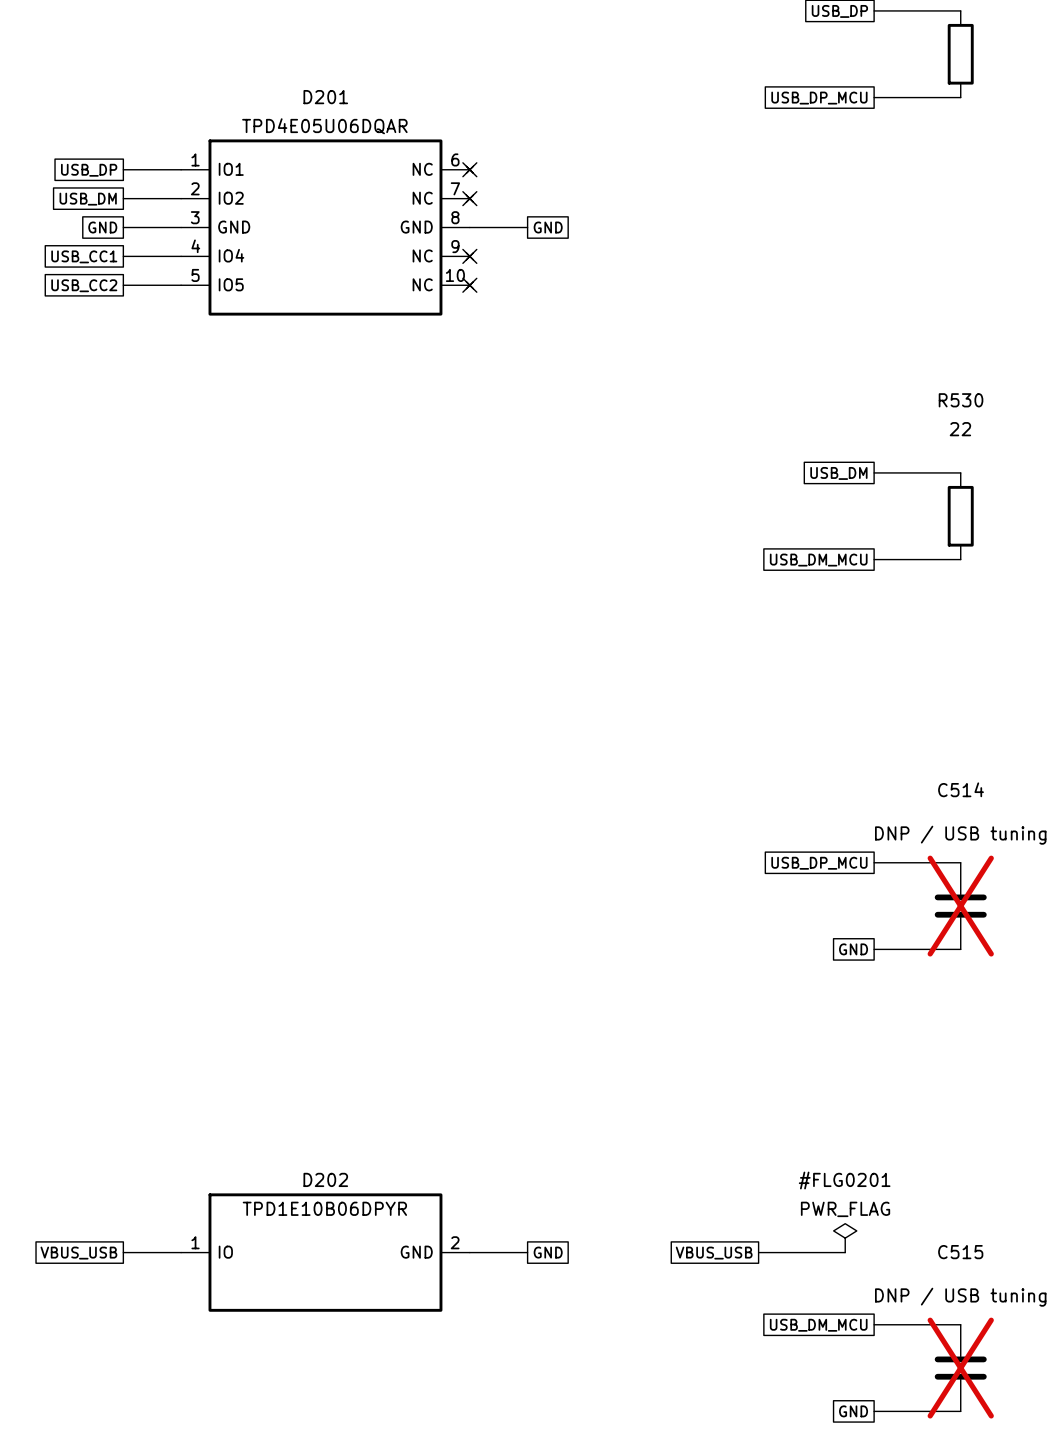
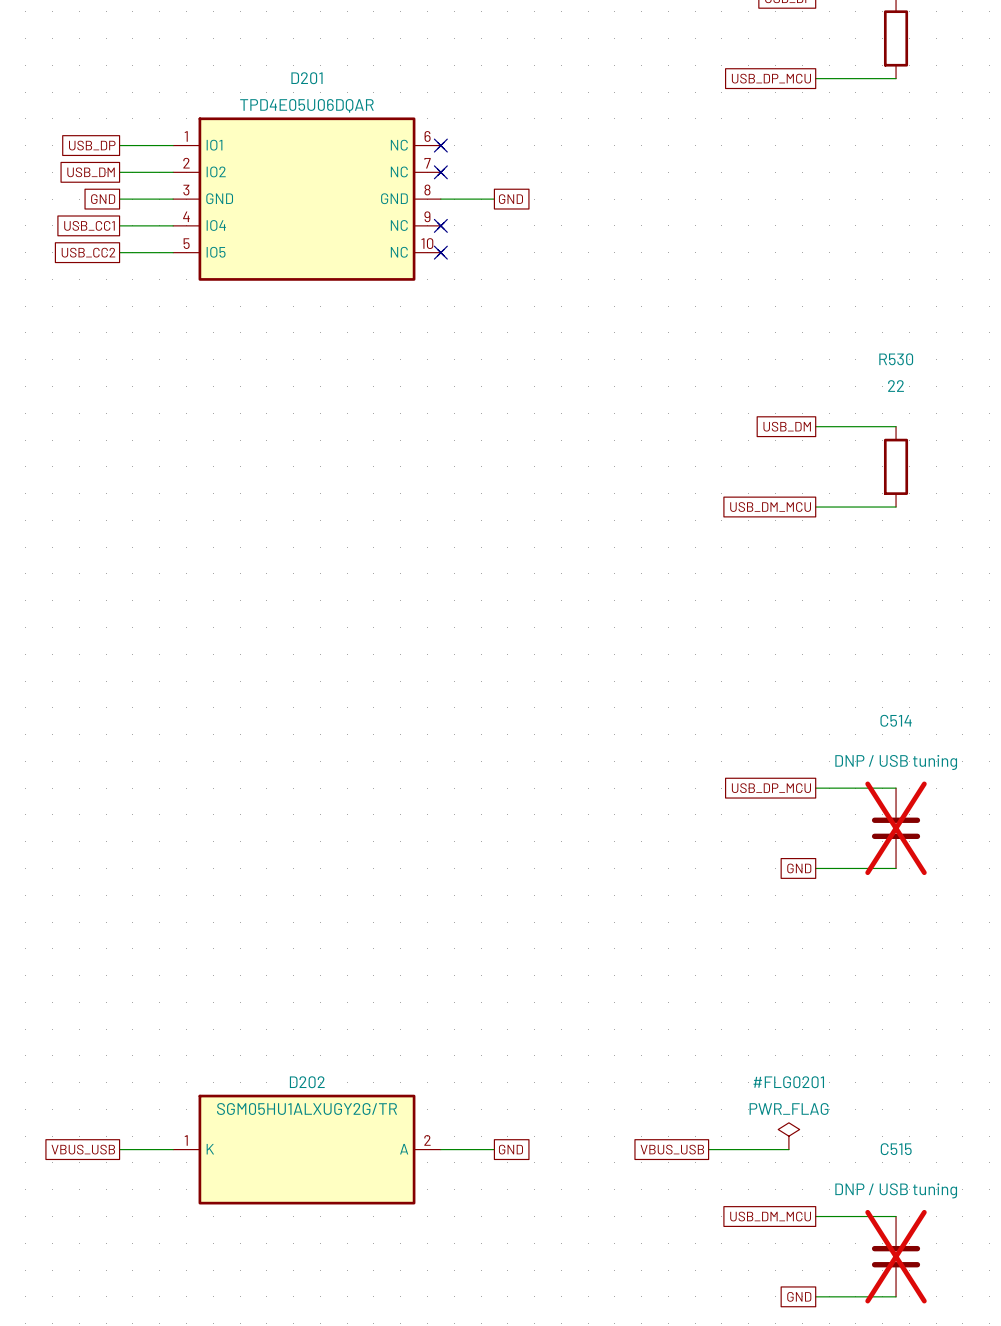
D202 value: TPD1E10B06DPYR (324, 1208) -> SGM05HU1ALXUGY2G/TR (307, 1109)
D202 pin name: IO (225, 1252) -> K (210, 1149)
D202 pin name: GND (416, 1252) -> A (404, 1149)

